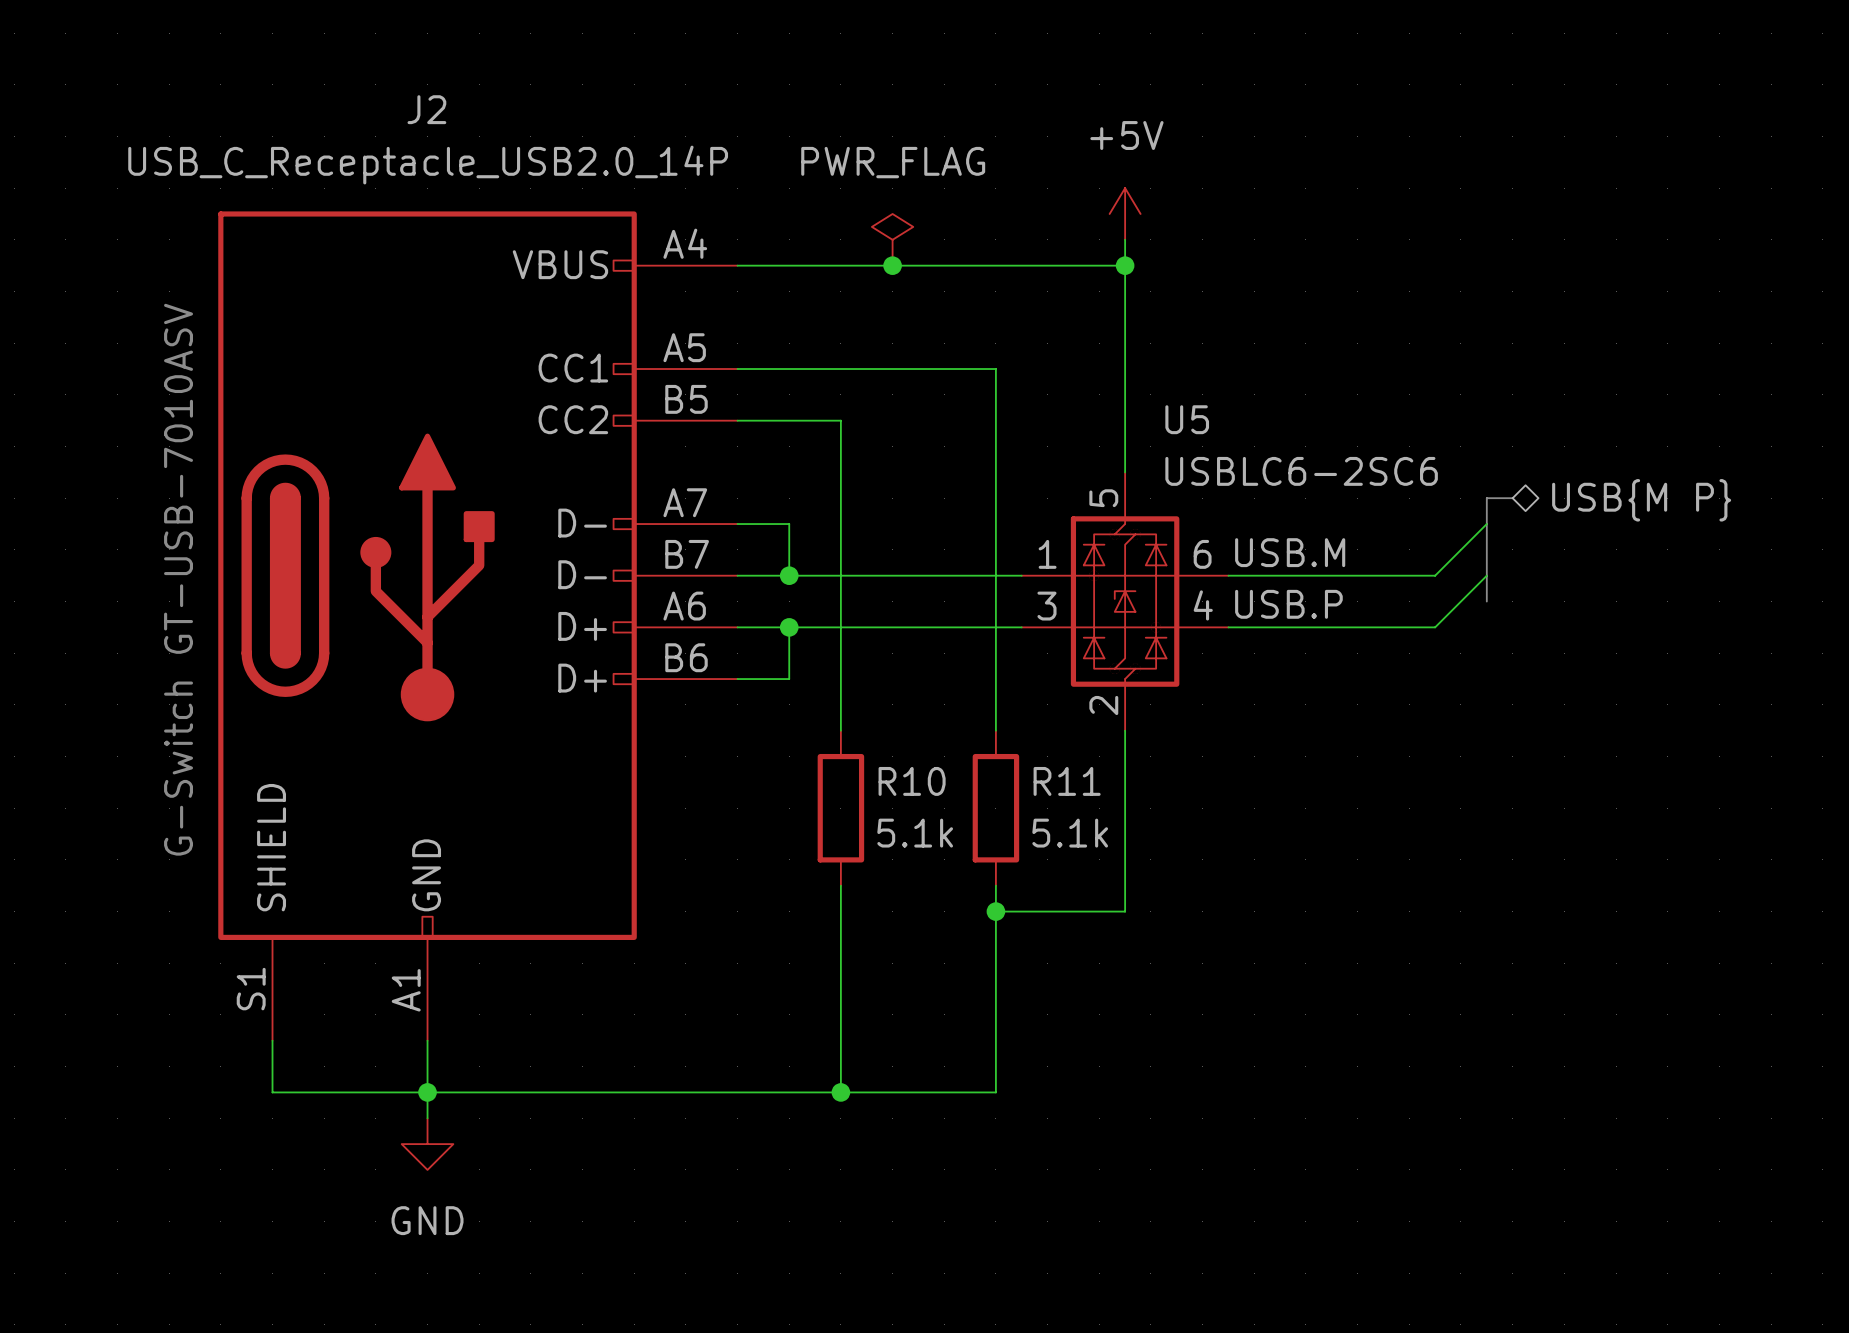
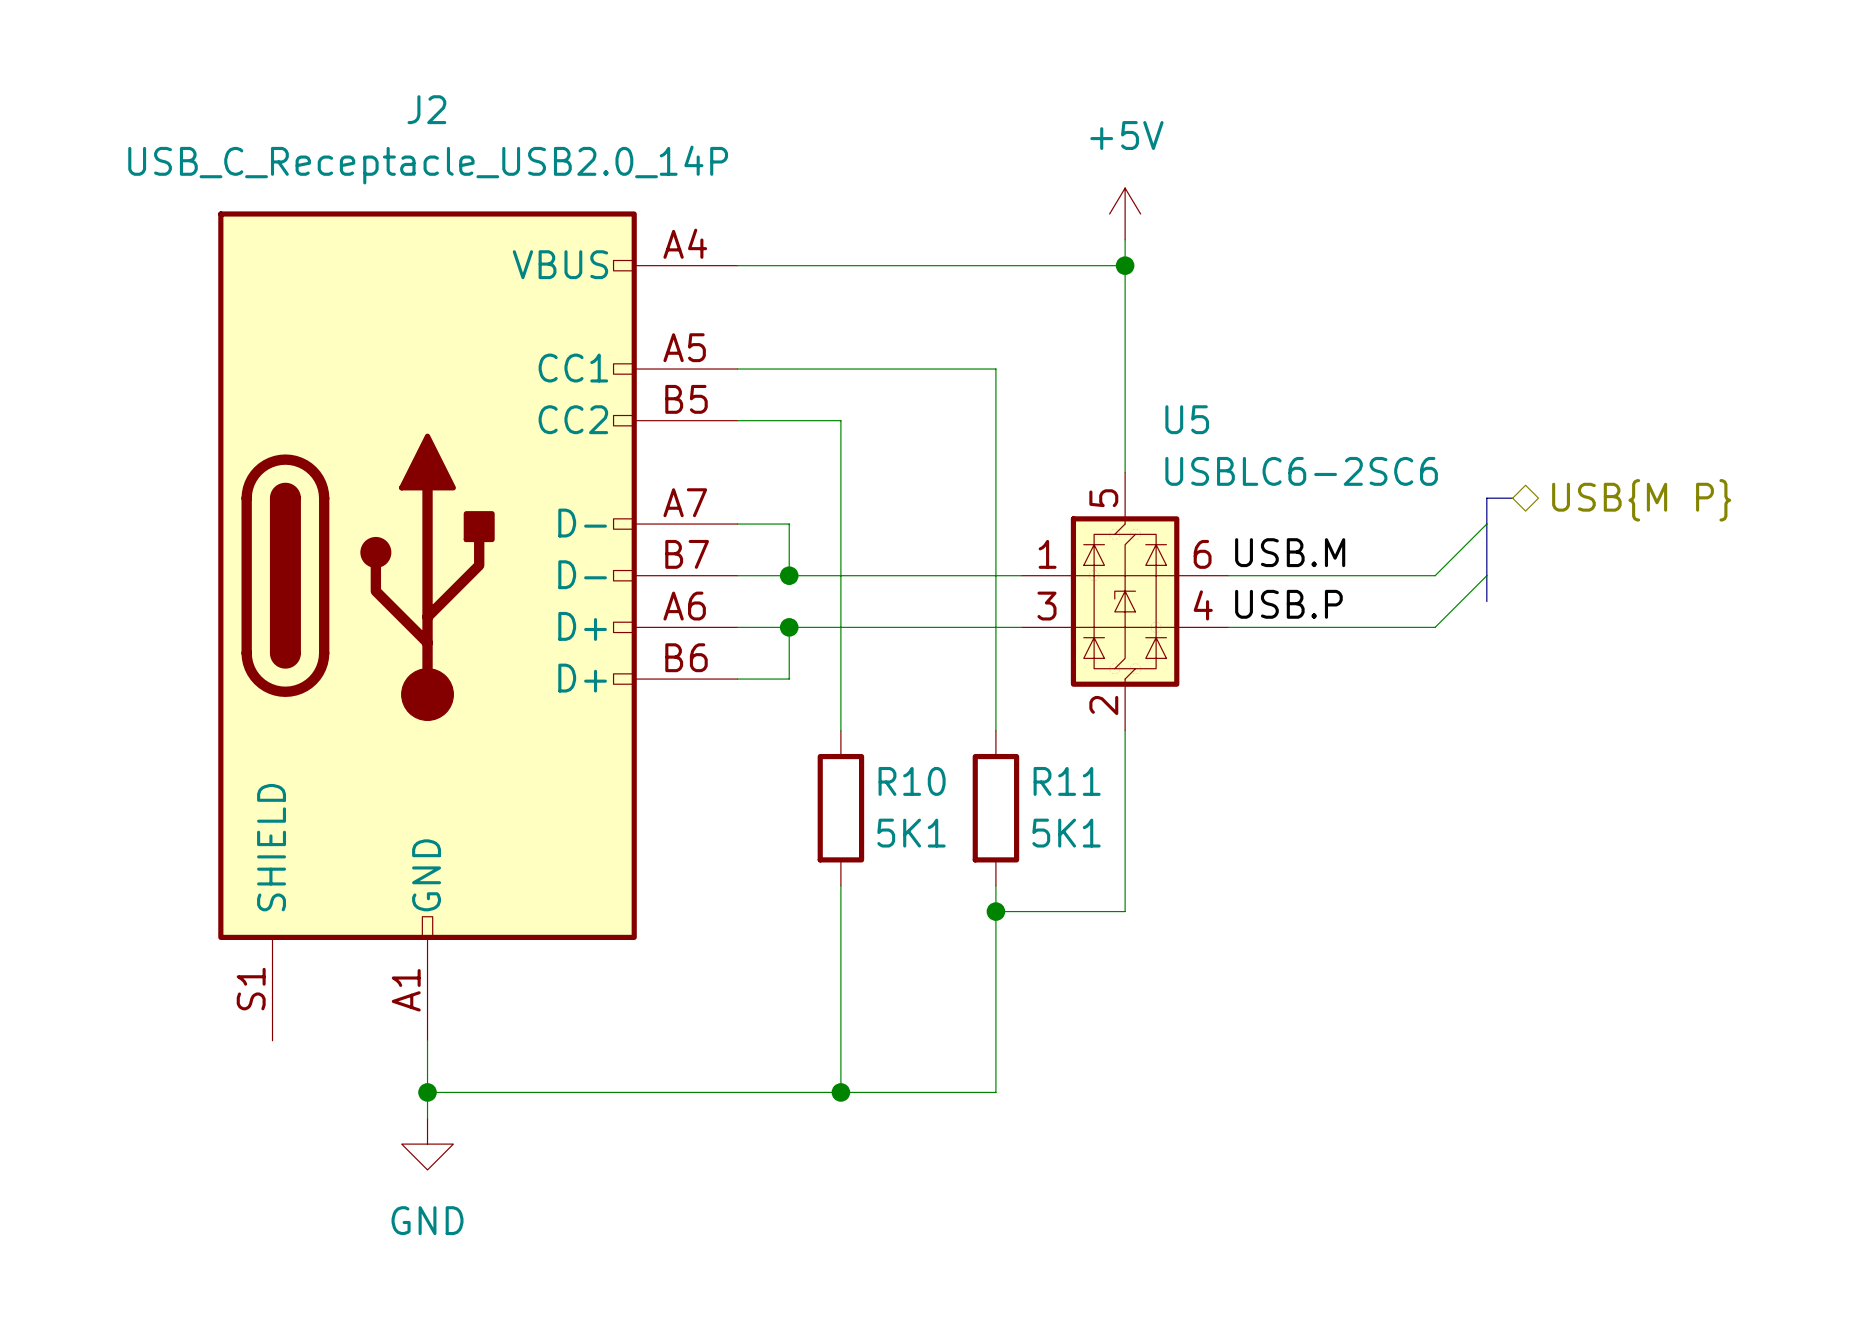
power symbol: PWR_FLAG (892, 239) -> none
junction: (892, 265) -> none
text: G-Switch GT-USB-7010ASV (178, 579) -> none
R10 value: 5.1k (915, 833) -> 5K1 (911, 833)
R11 value: 5.1k (1070, 833) -> 5K1 (1066, 833)
wire: (272, 1040) (272, 1092) (427, 1092) -> none

